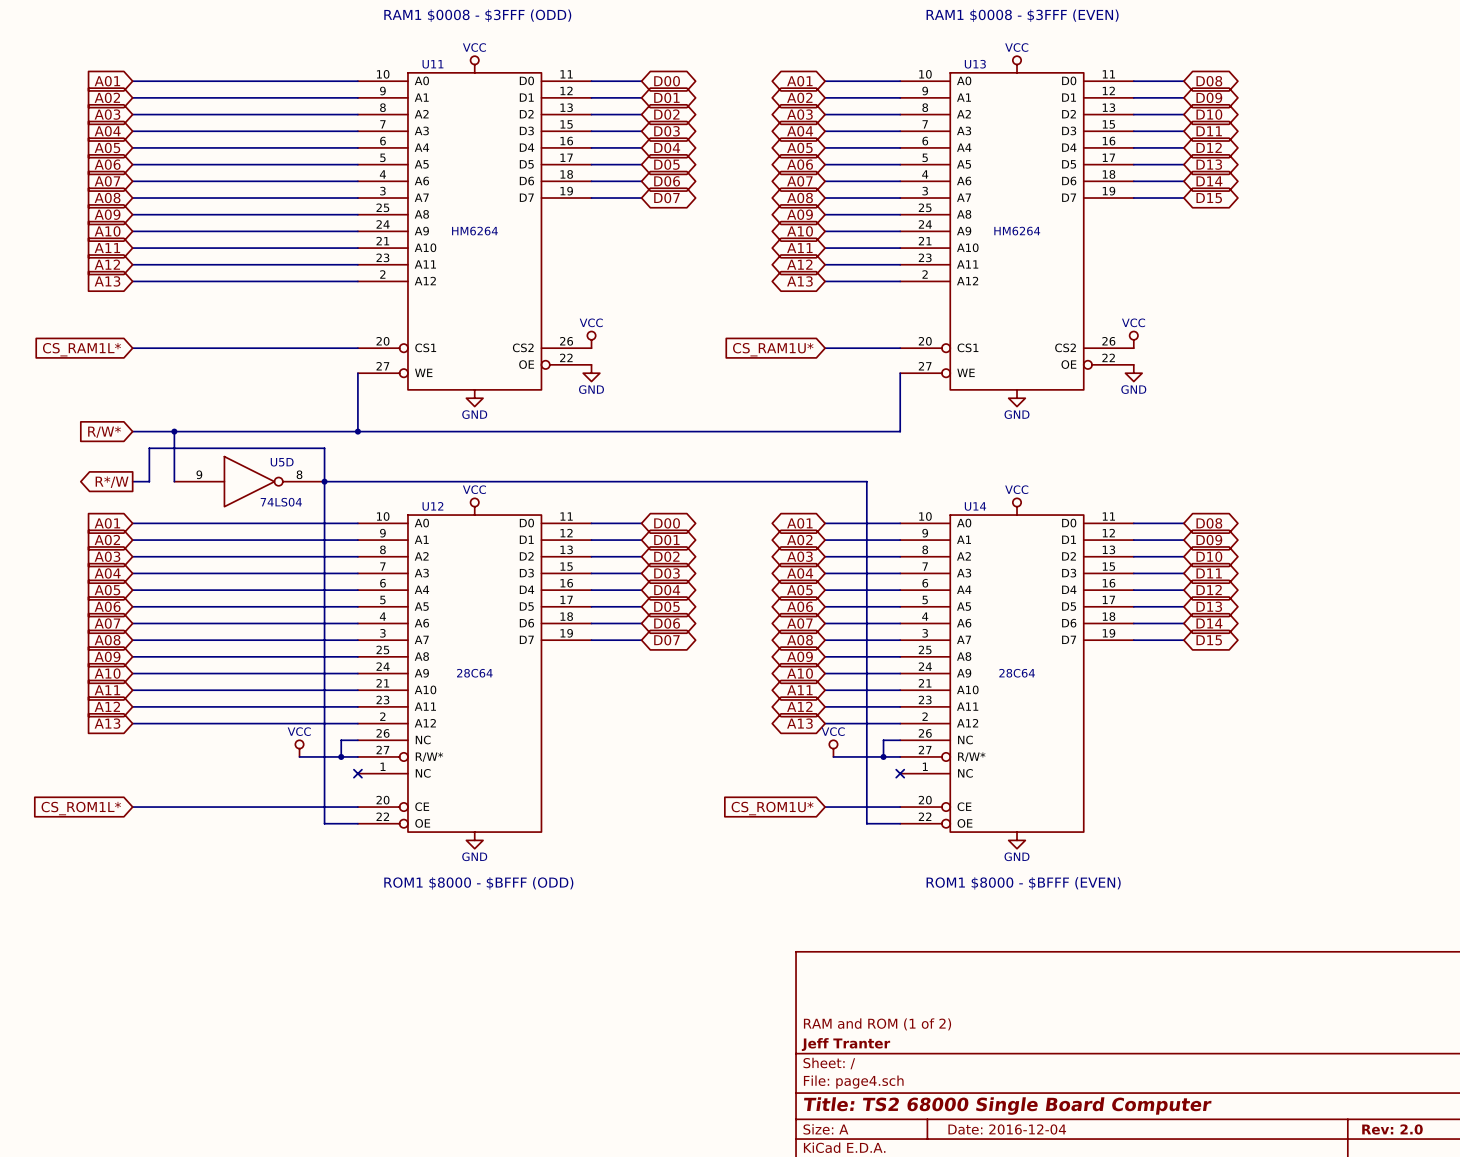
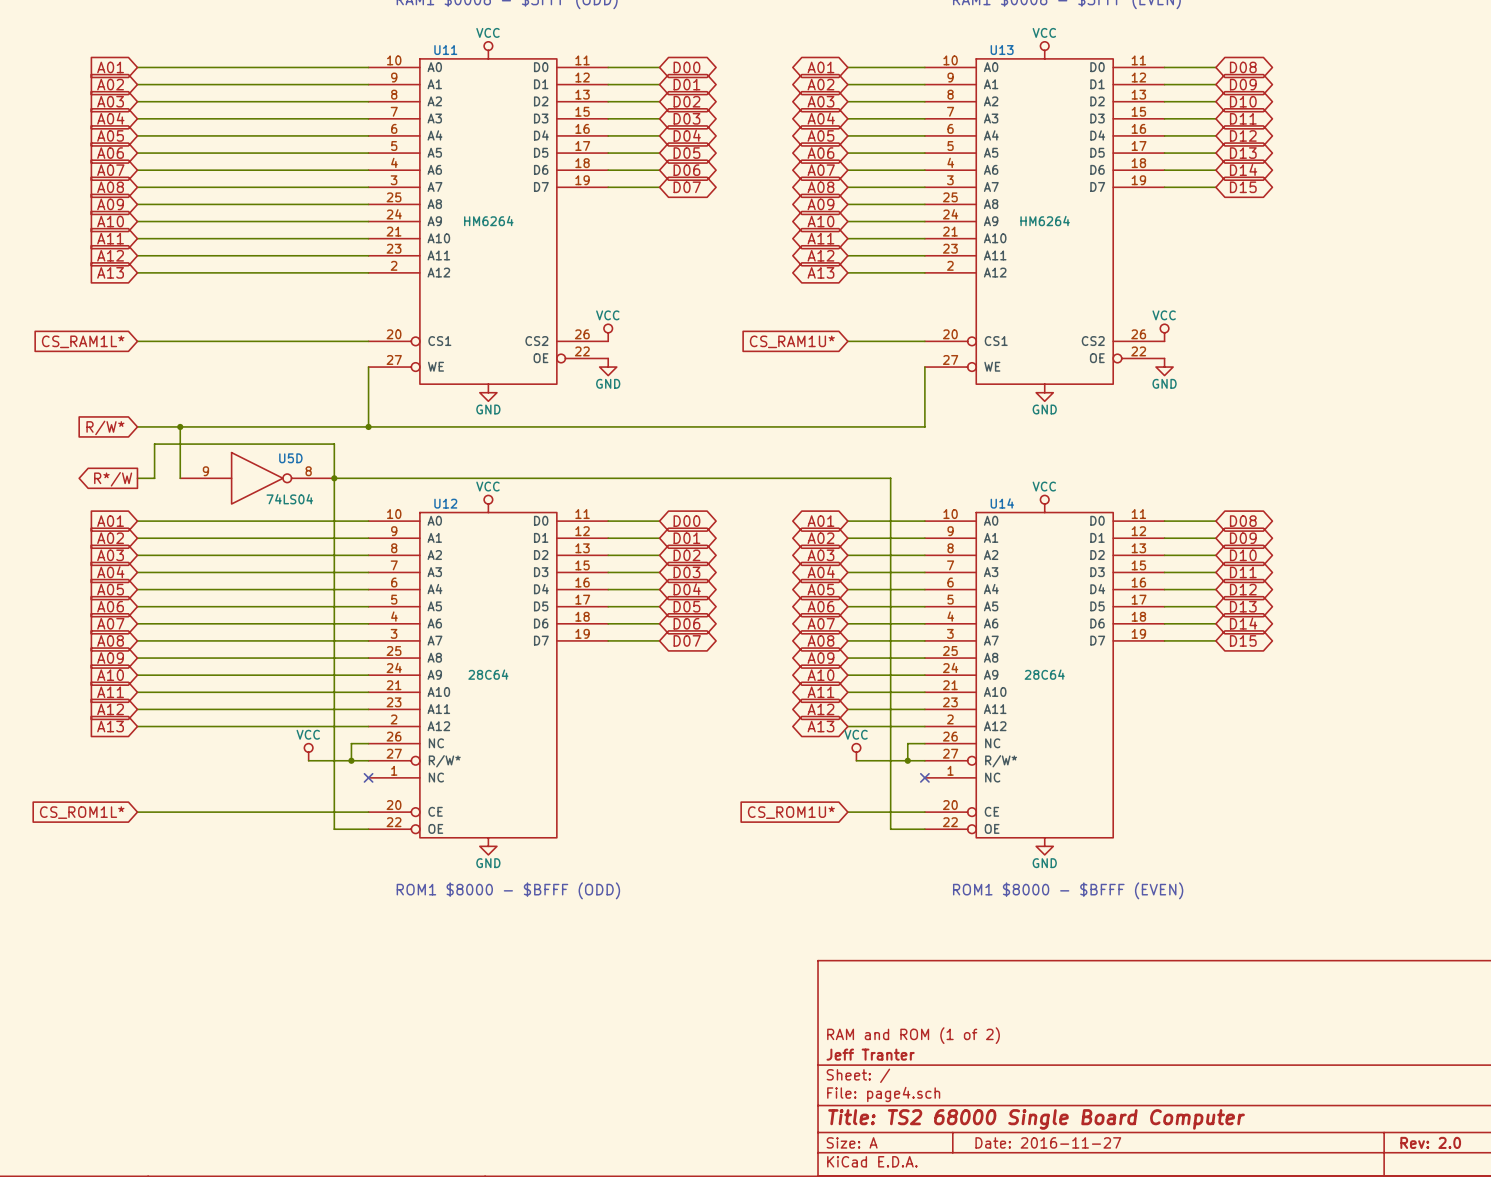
title block: Date: 2016-12-04 (1007, 1129) -> Date: 2016-11-27 (1048, 1142)

